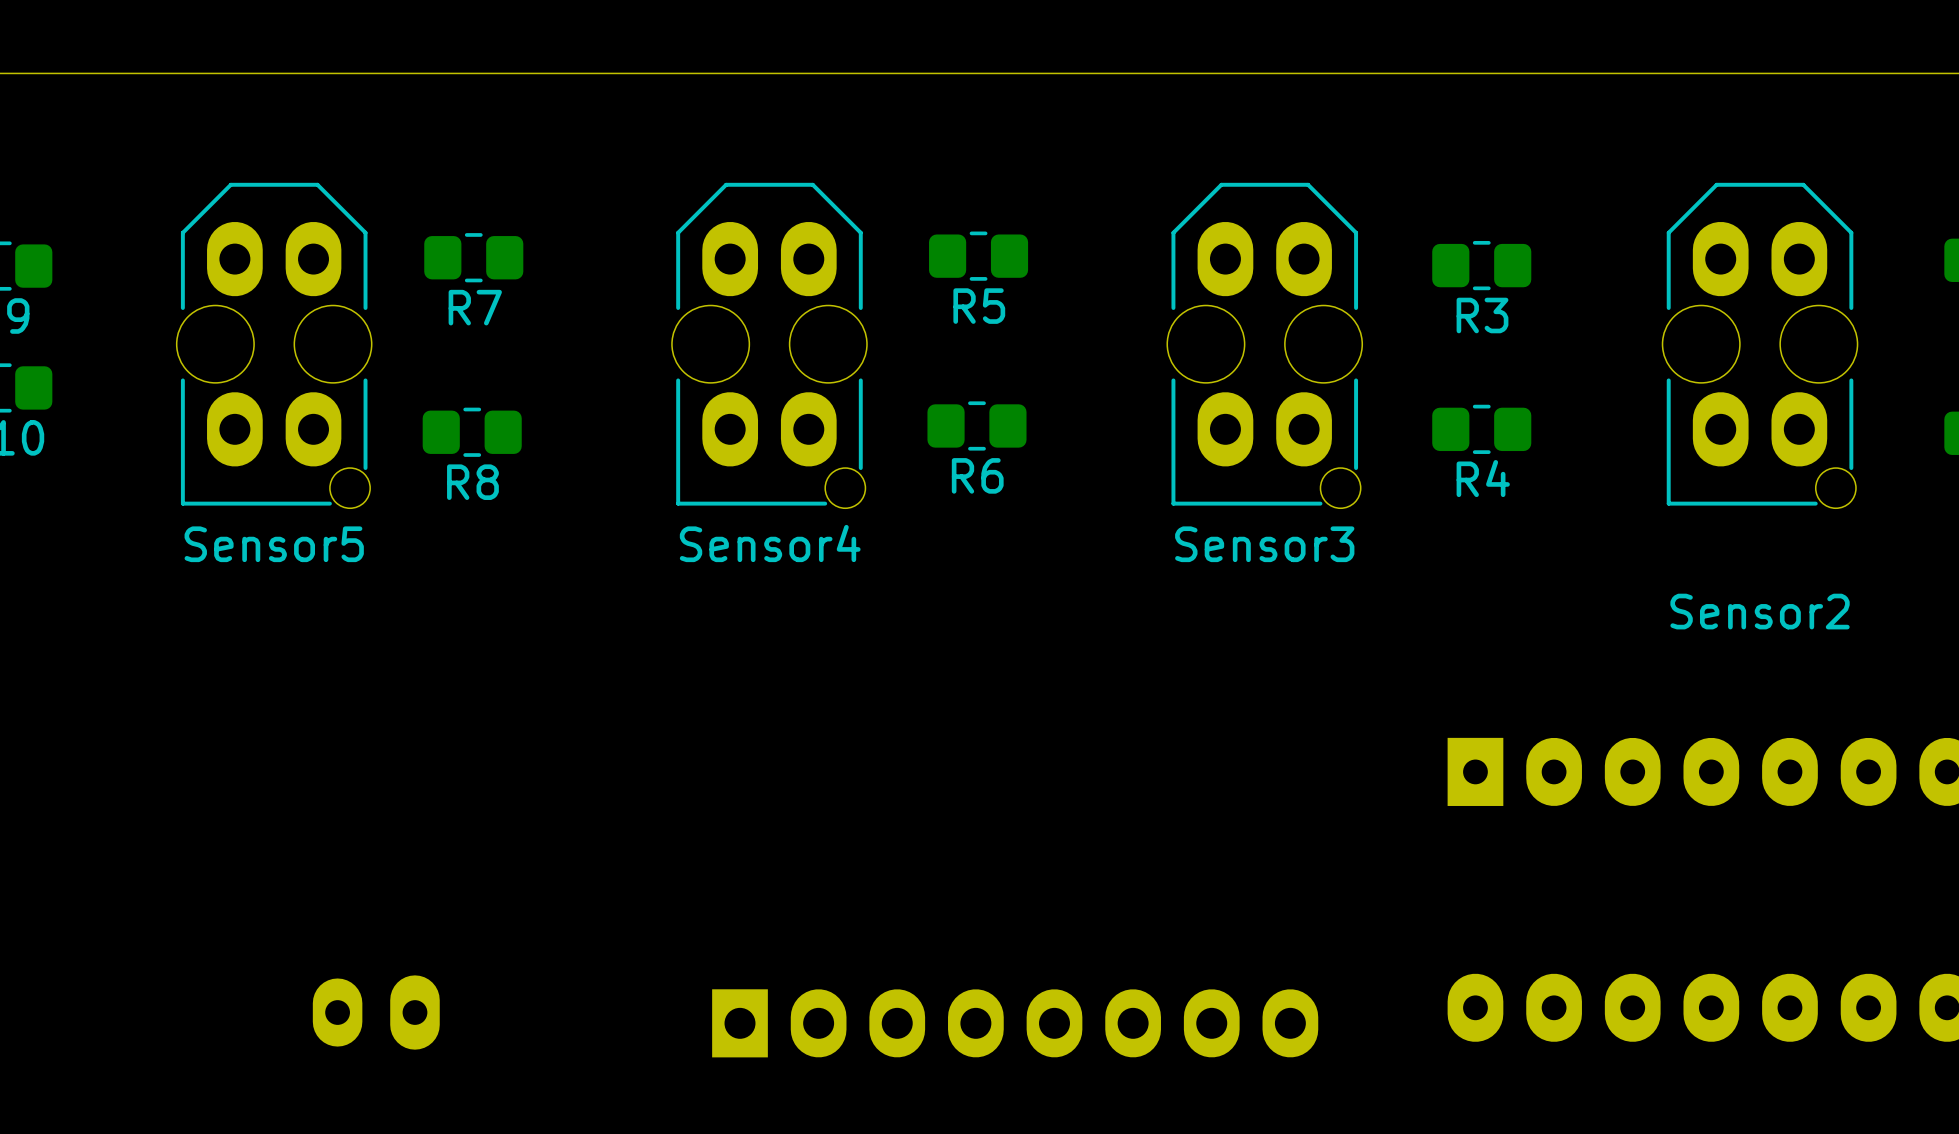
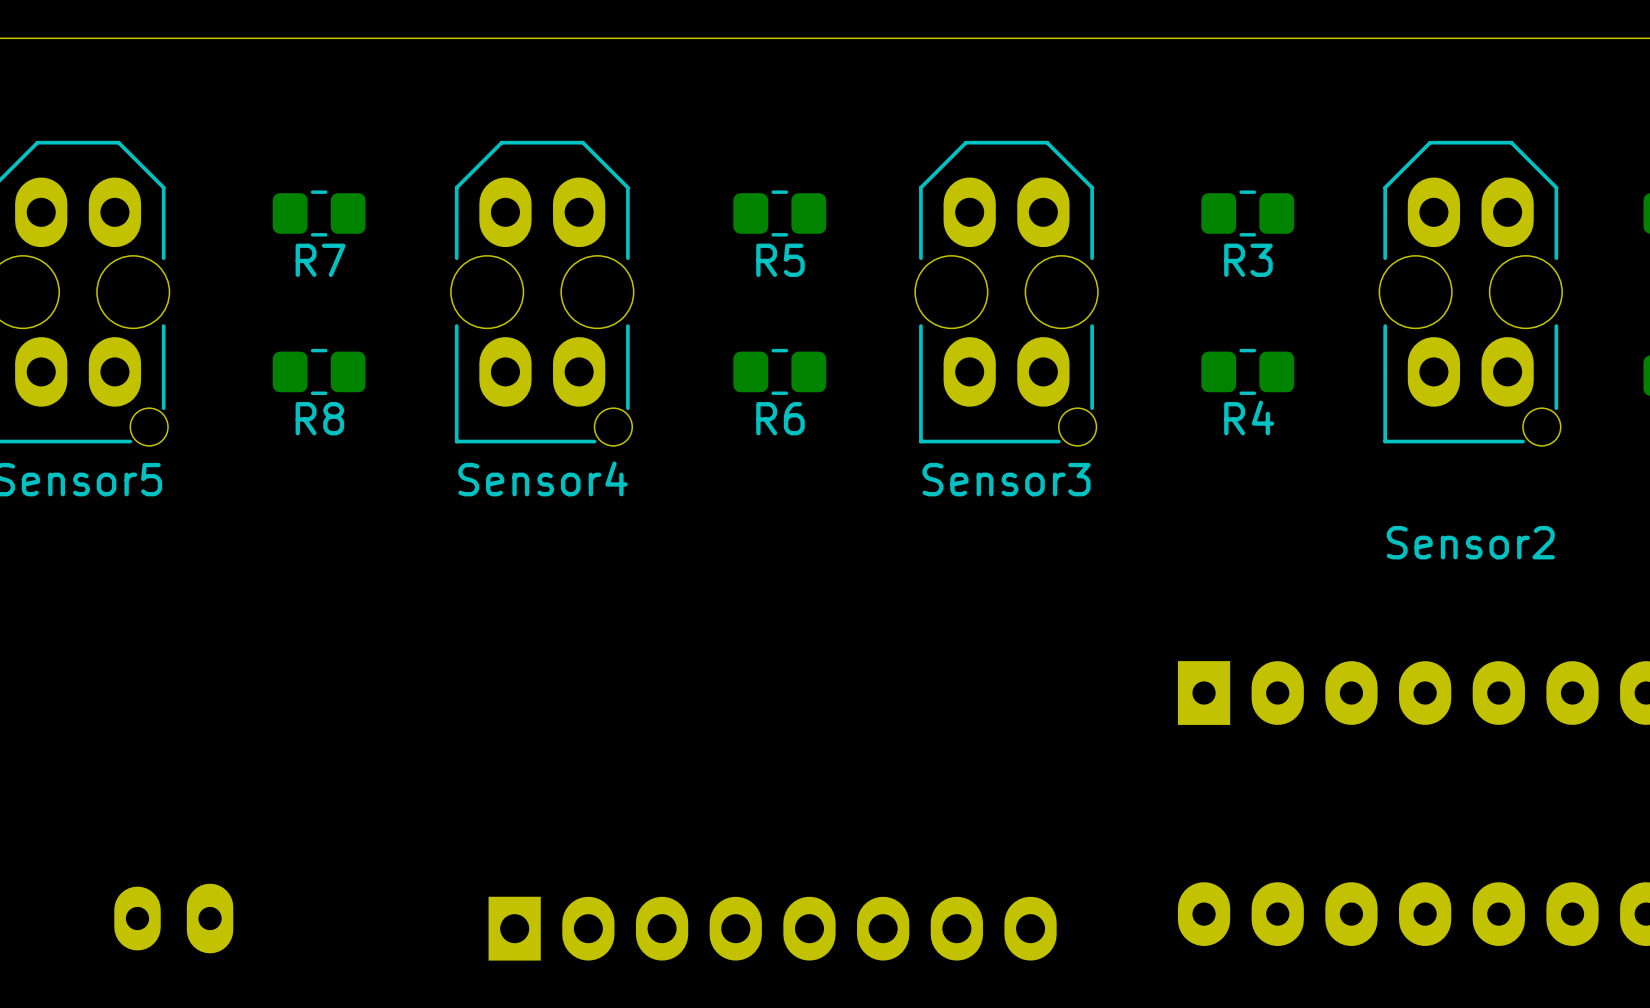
R5 position: (978, 256) -> (779, 213)
R7 position: (473, 257) -> (319, 213)
R3 position: (1481, 265) -> (1247, 213)
R6 position: (976, 425) -> (779, 371)
R4 position: (1481, 429) -> (1247, 371)
R8 position: (472, 432) -> (319, 371)

